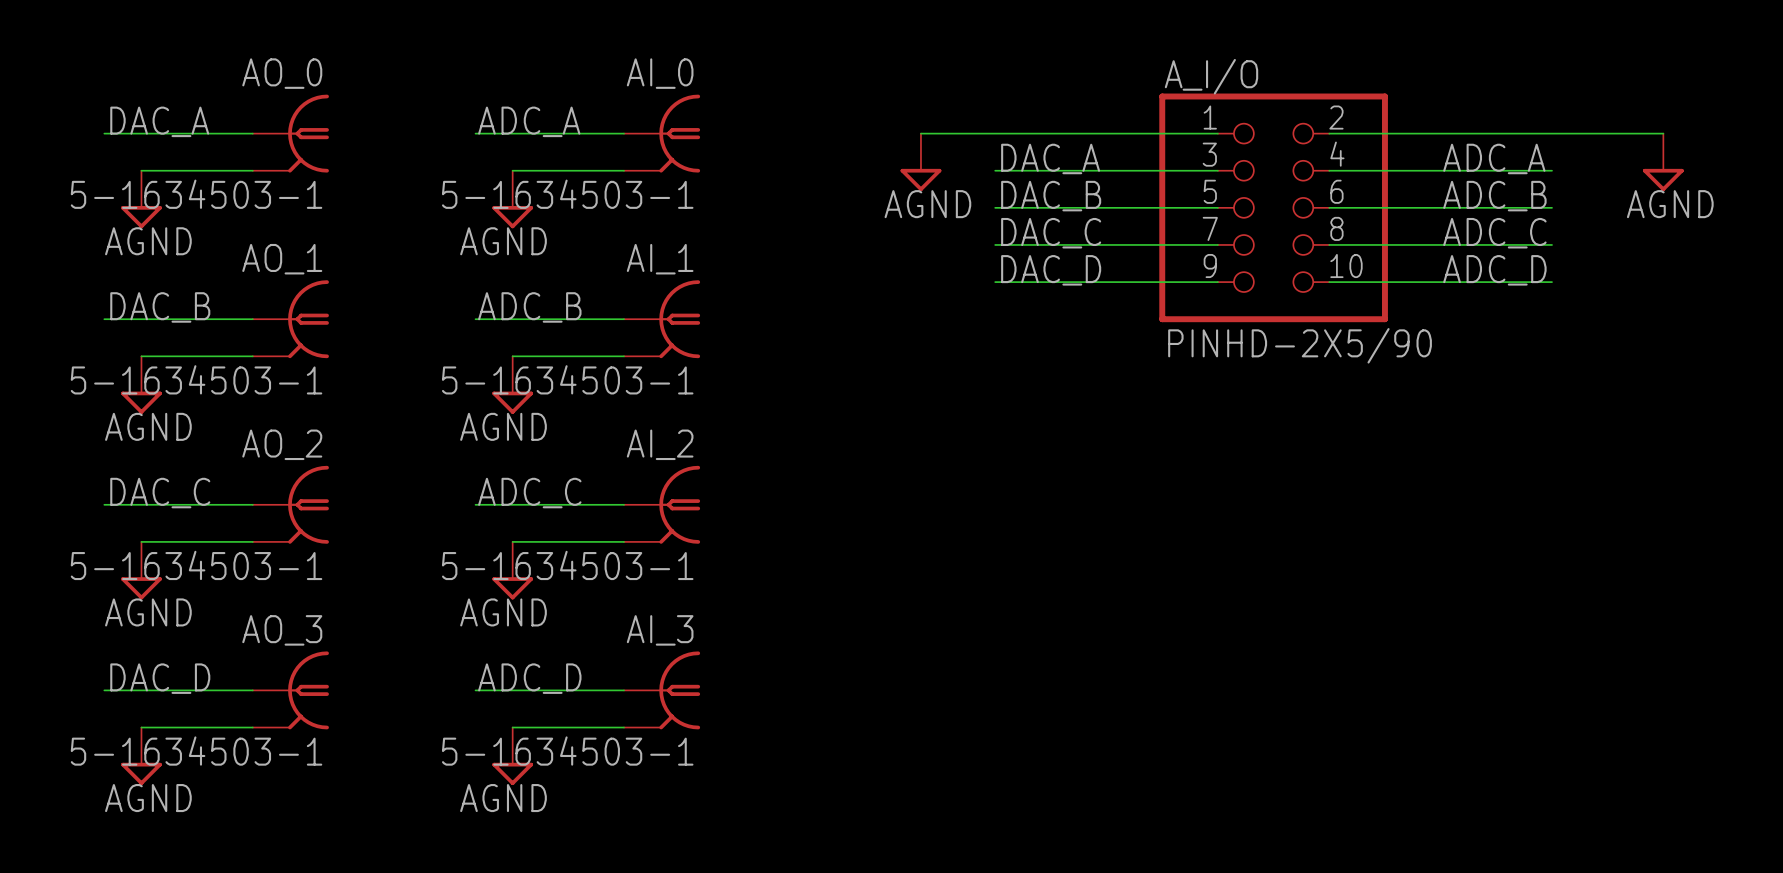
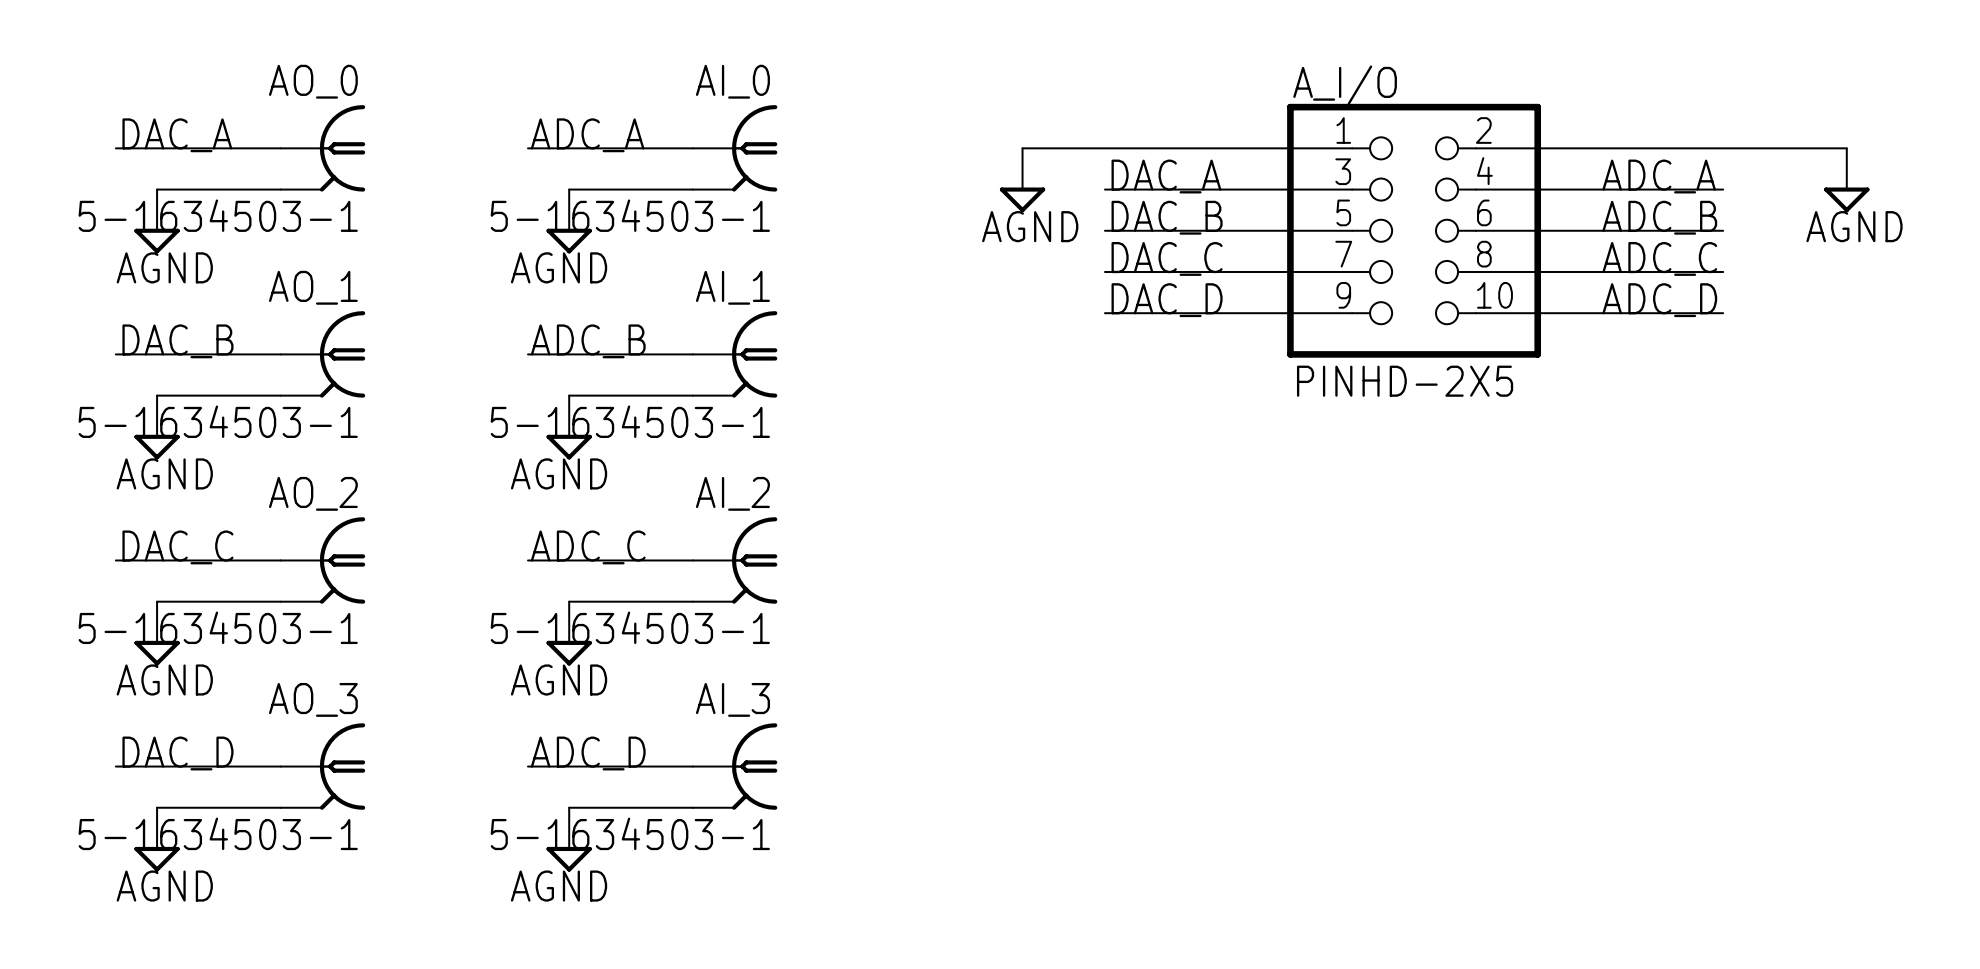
A_I/O value: PINHD-2X5/90 (1300, 345) -> PINHD-2X5 (1405, 381)

